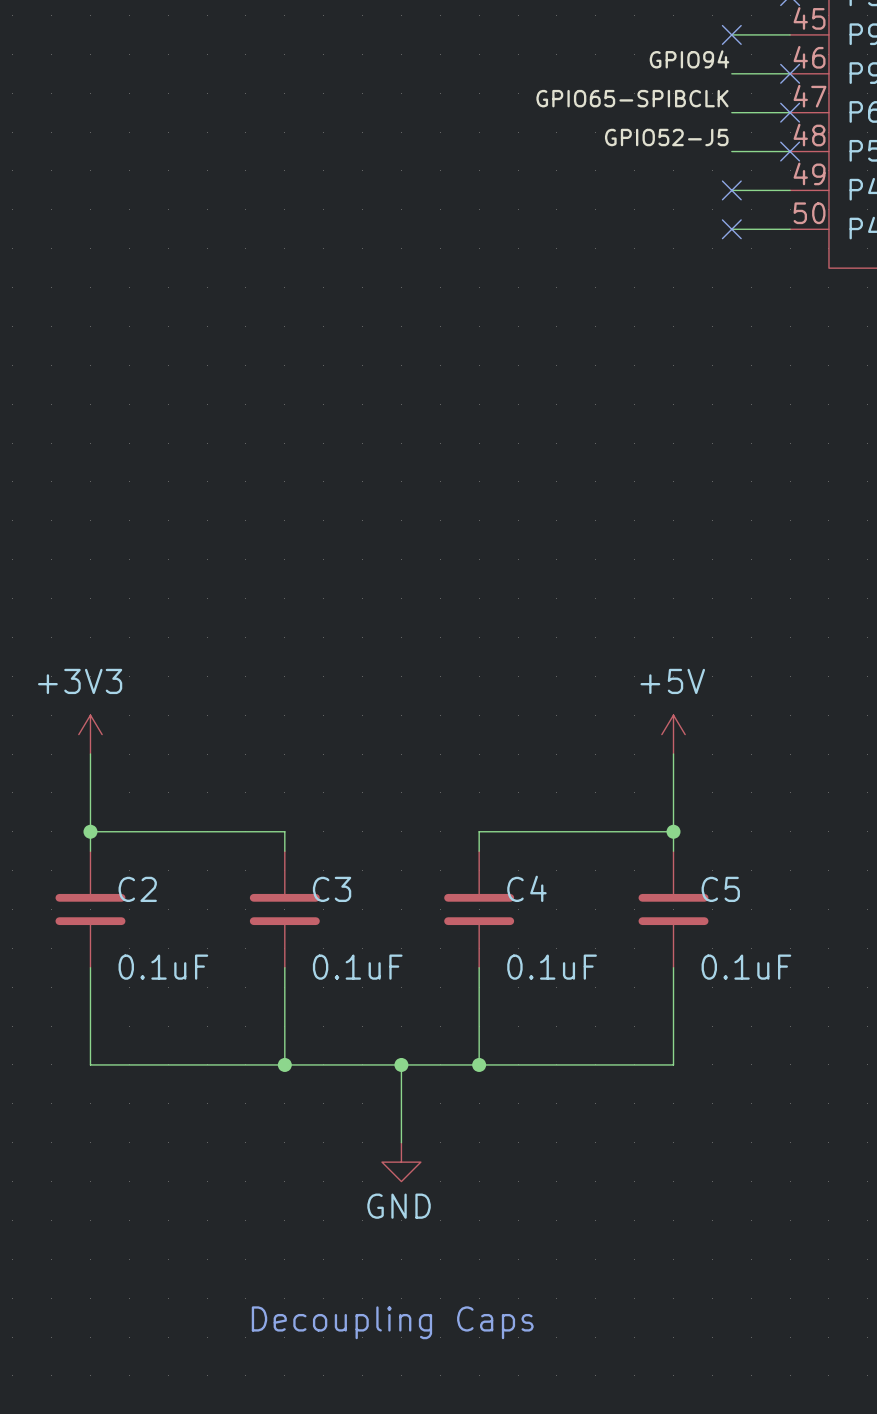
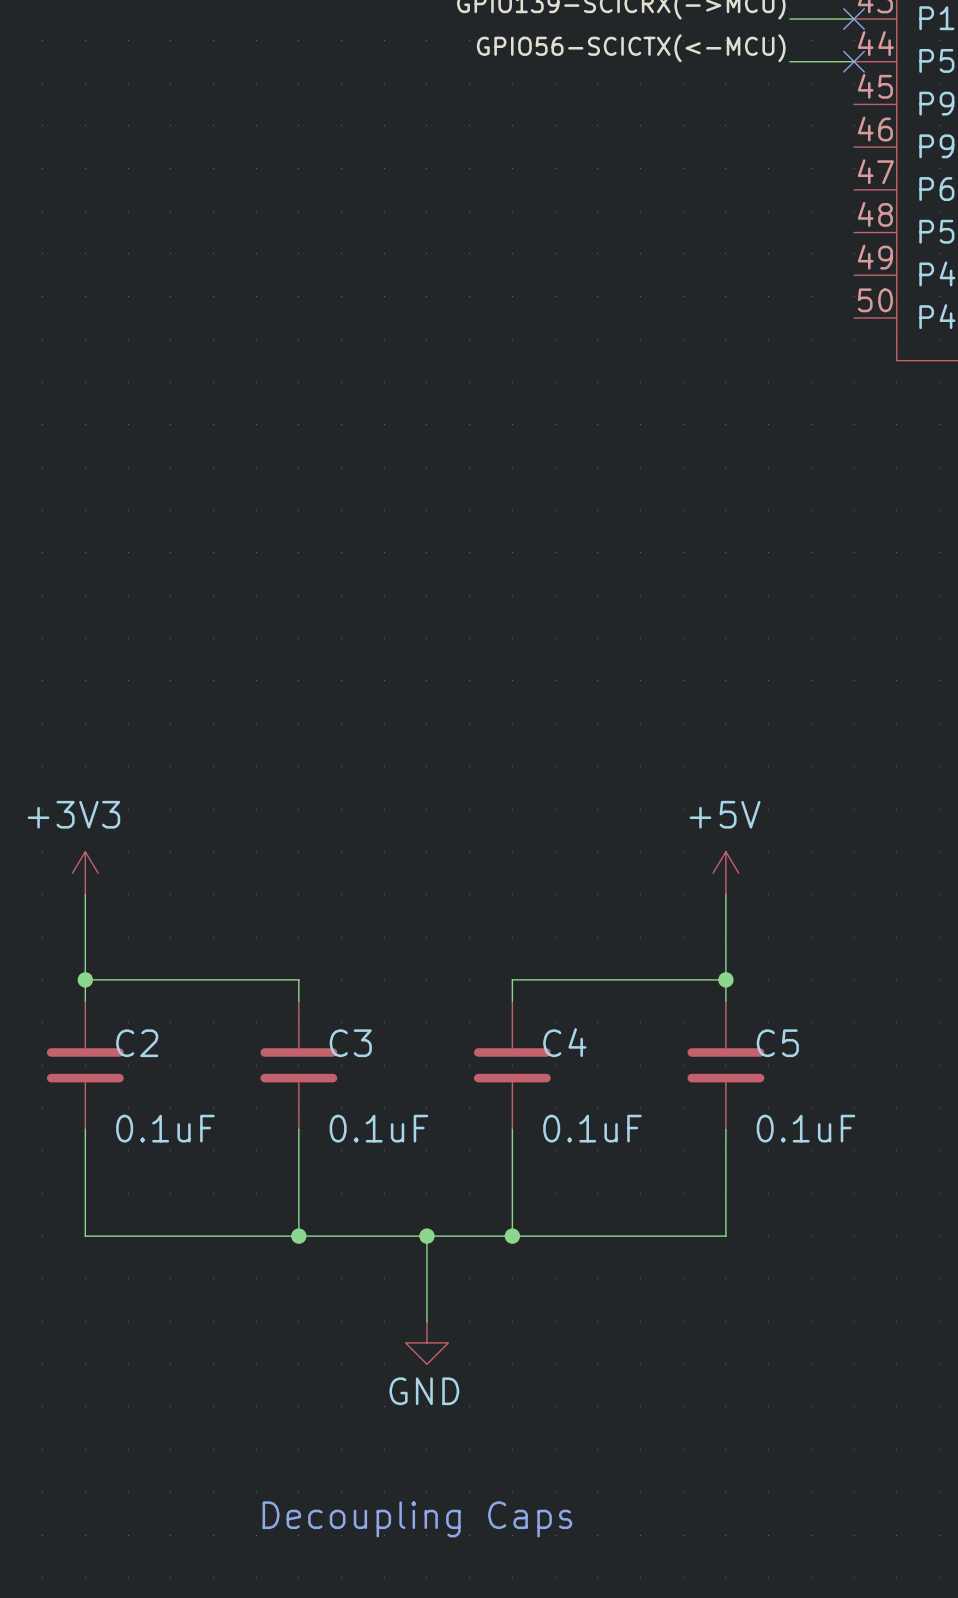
wire: (731, 34) (790, 34) -> none
no-connect mark: (731, 34) -> none
label: GPIO94 (689, 59) -> none
wire: (731, 73) (790, 73) -> none
no-connect mark: (790, 73) -> none
label: GPIO65-SPIBCLK (632, 98) -> none
wire: (731, 112) (790, 112) -> none
no-connect mark: (790, 112) -> none
label: GPIO52-J5 (666, 137) -> none
wire: (731, 151) (790, 151) -> none
no-connect mark: (790, 151) -> none
wire: (731, 190) (790, 190) -> none
no-connect mark: (731, 190) -> none
wire: (731, 229) (790, 229) -> none
no-connect mark: (731, 229) -> none

